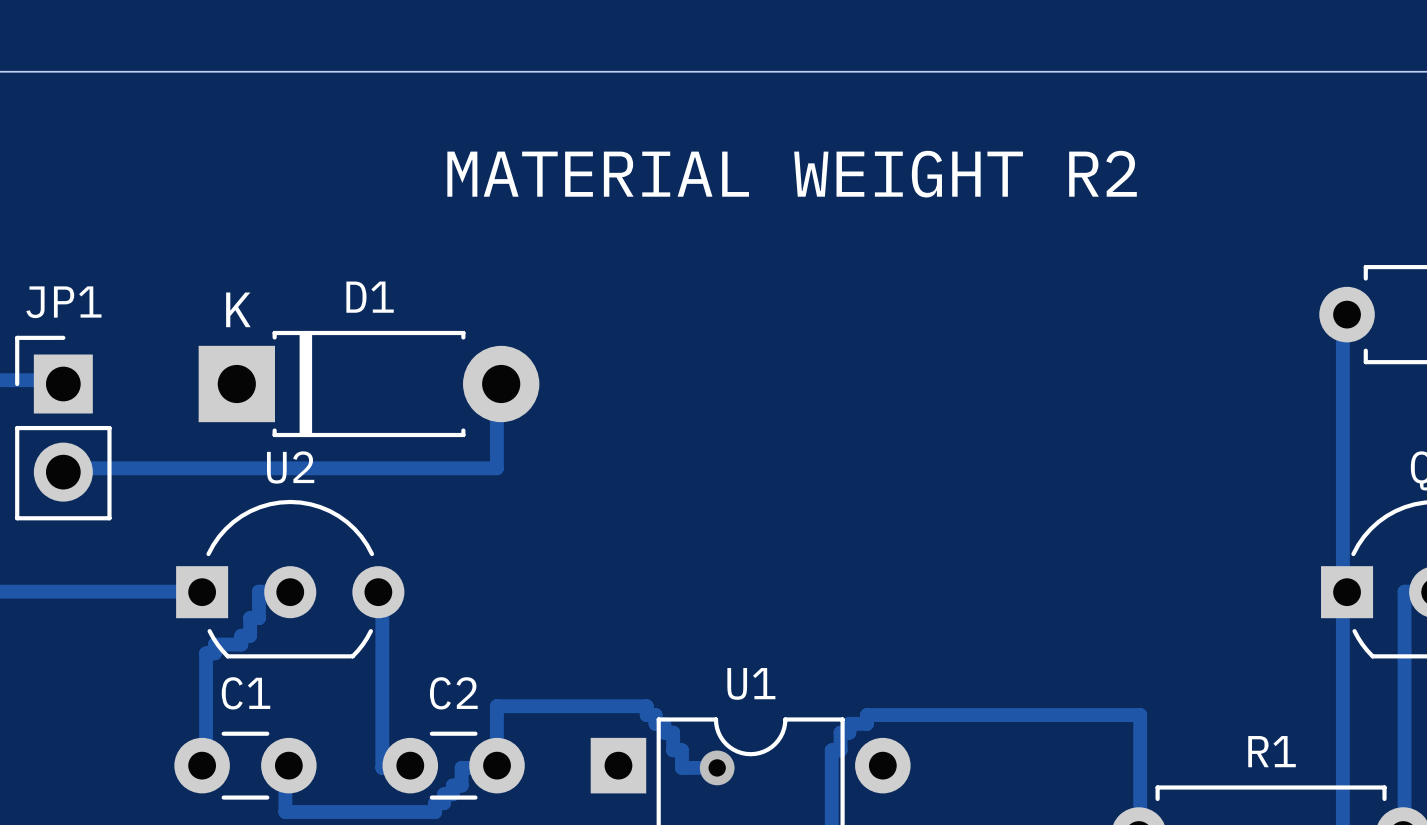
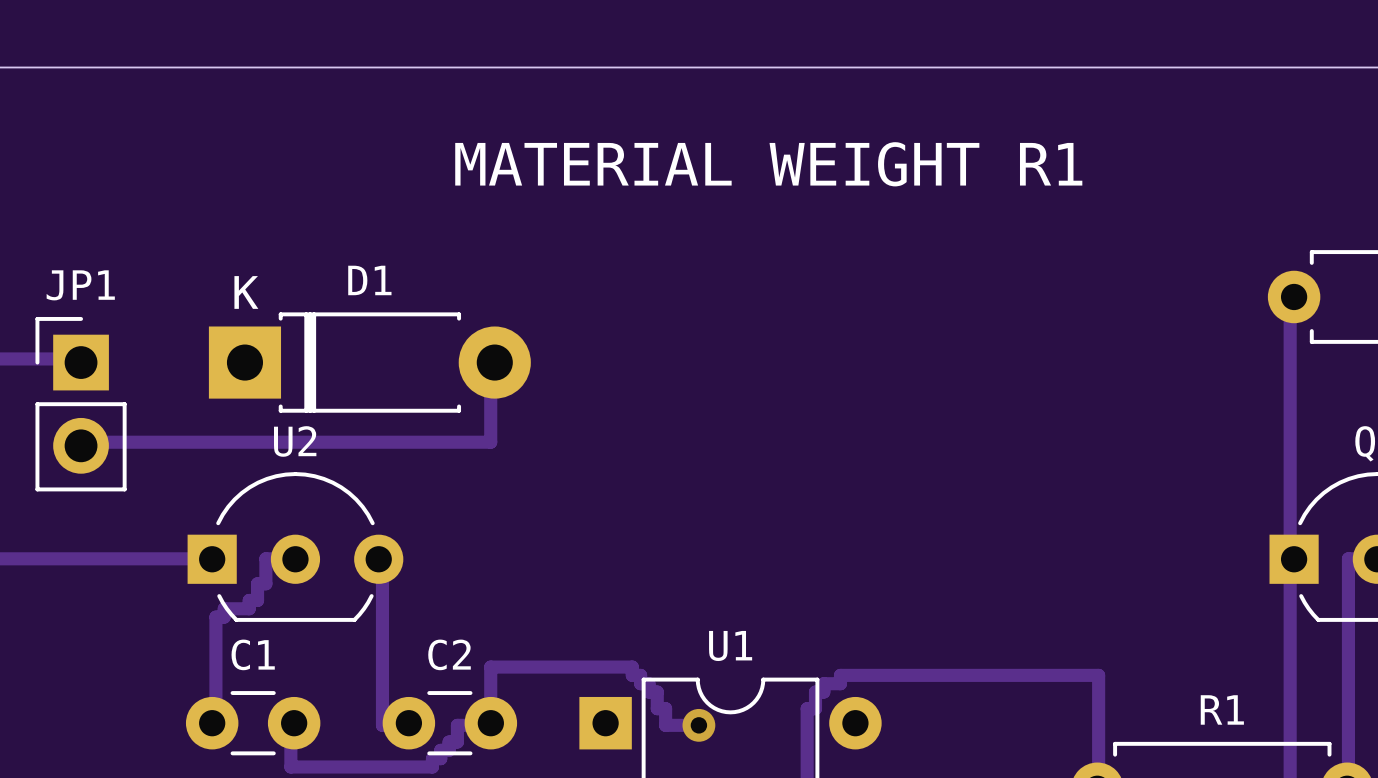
text: MATERIAL WEIGHT R2 (792, 174) -> MATERIAL WEIGHT R1 (768, 164)

